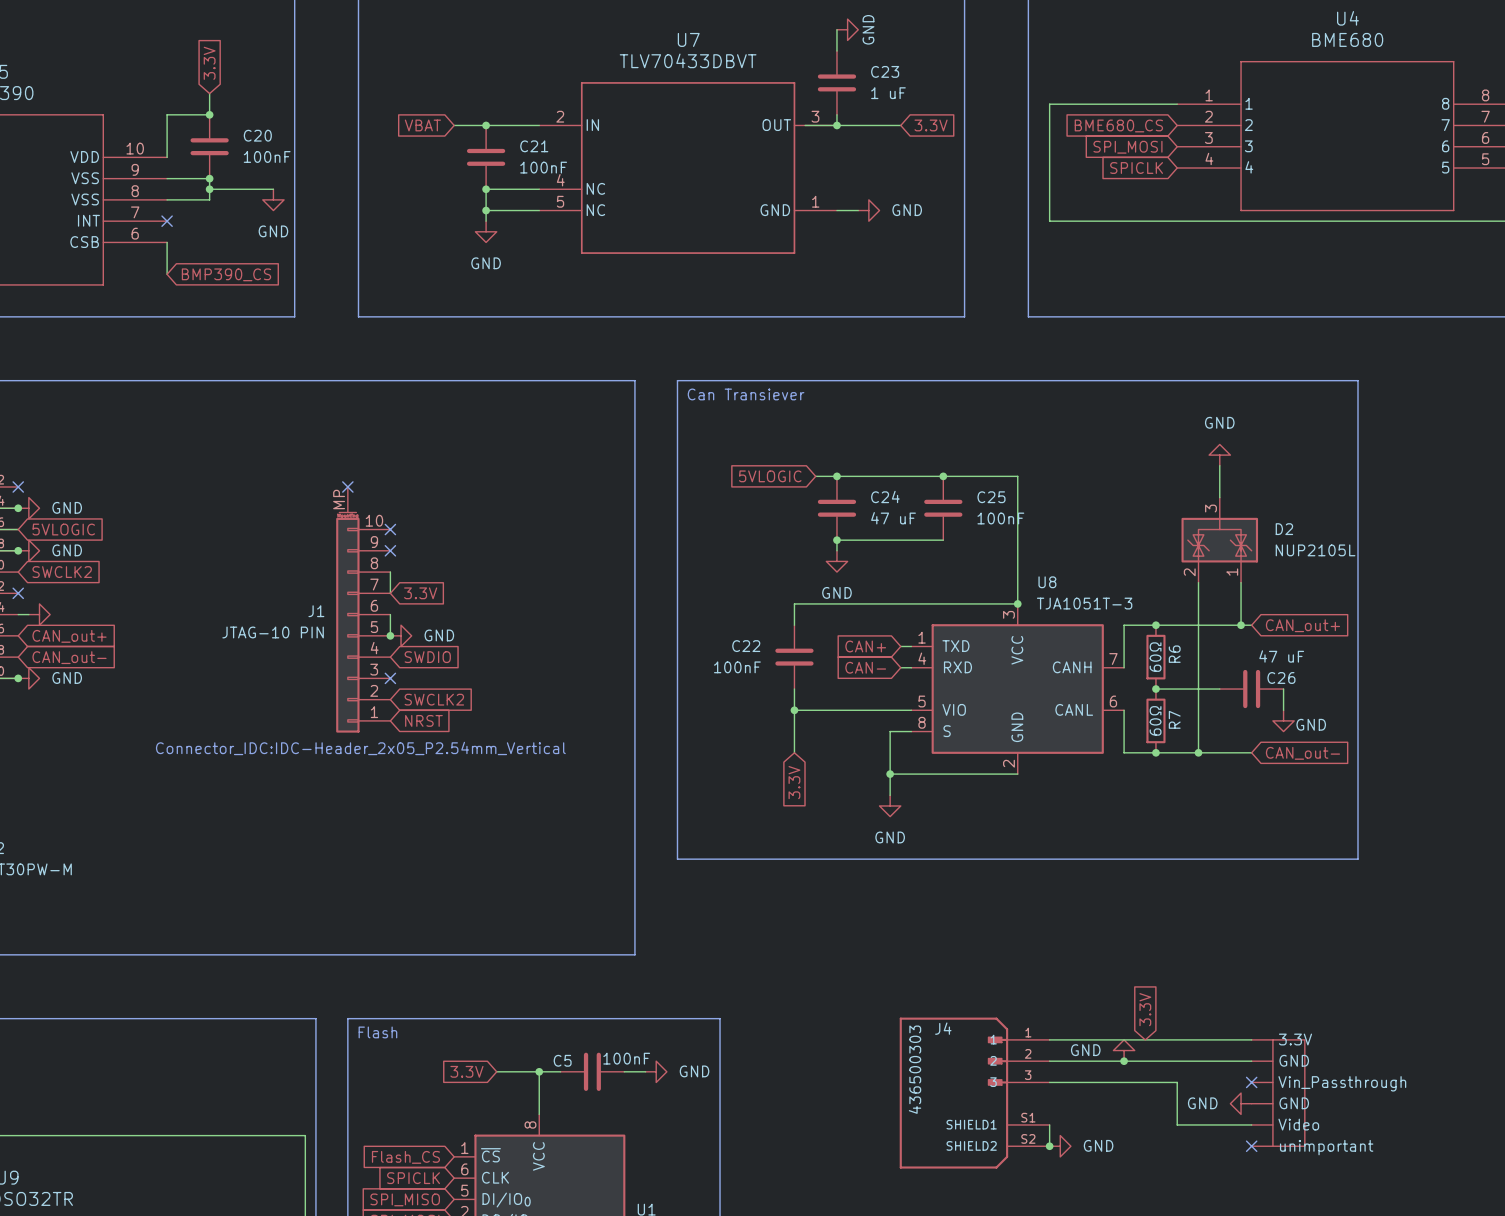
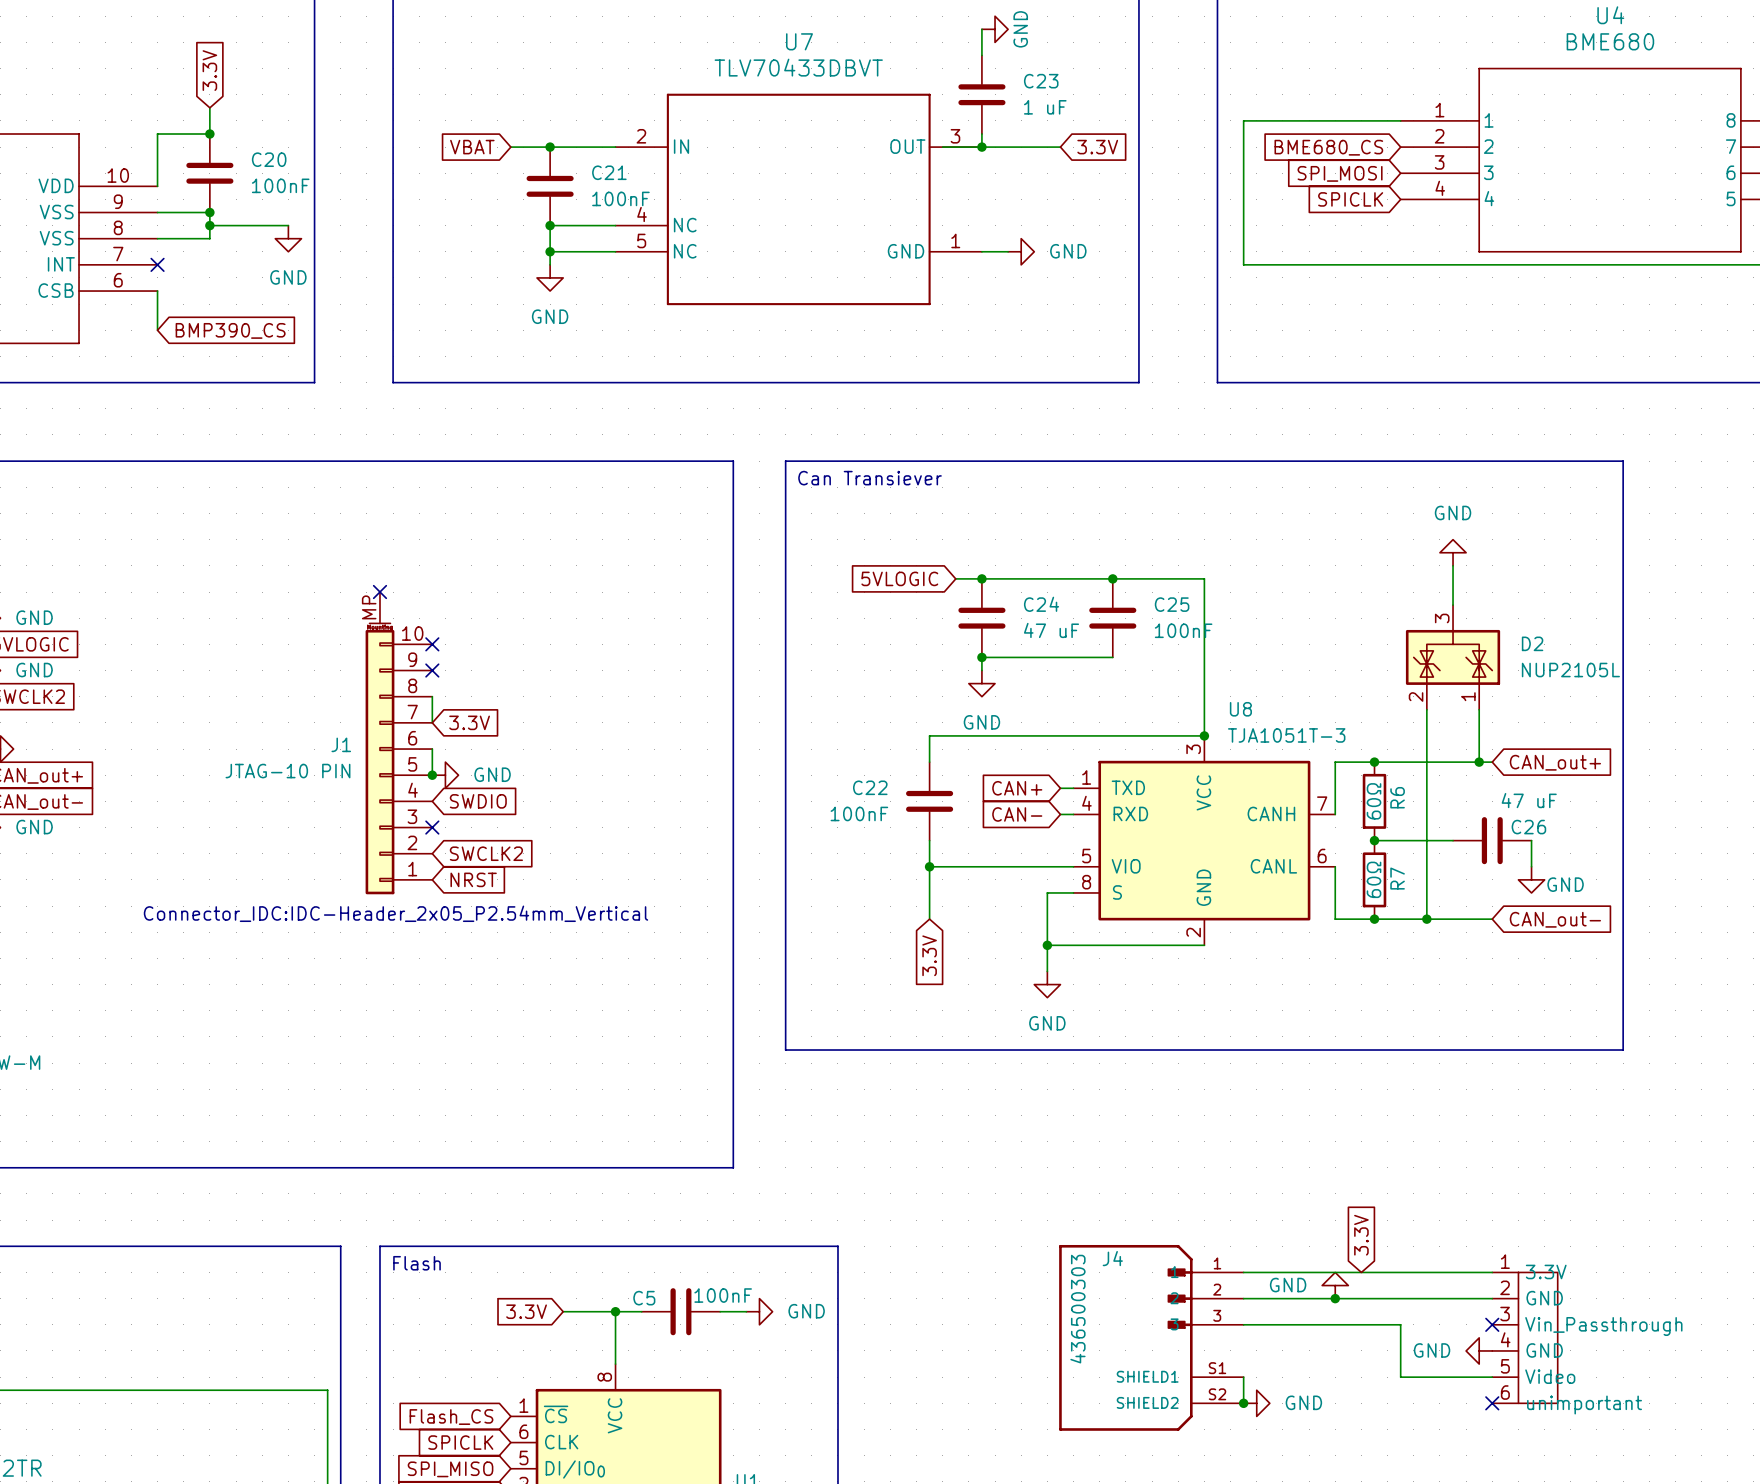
part pin number: none -> 1 (1505, 1261)
part pin number: none -> 2 (1505, 1287)
part pin number: none -> 3 (1505, 1314)
part pin number: none -> 4 (1505, 1339)
part pin number: none -> 5 (1505, 1366)
part pin number: none -> 6 (1505, 1392)

